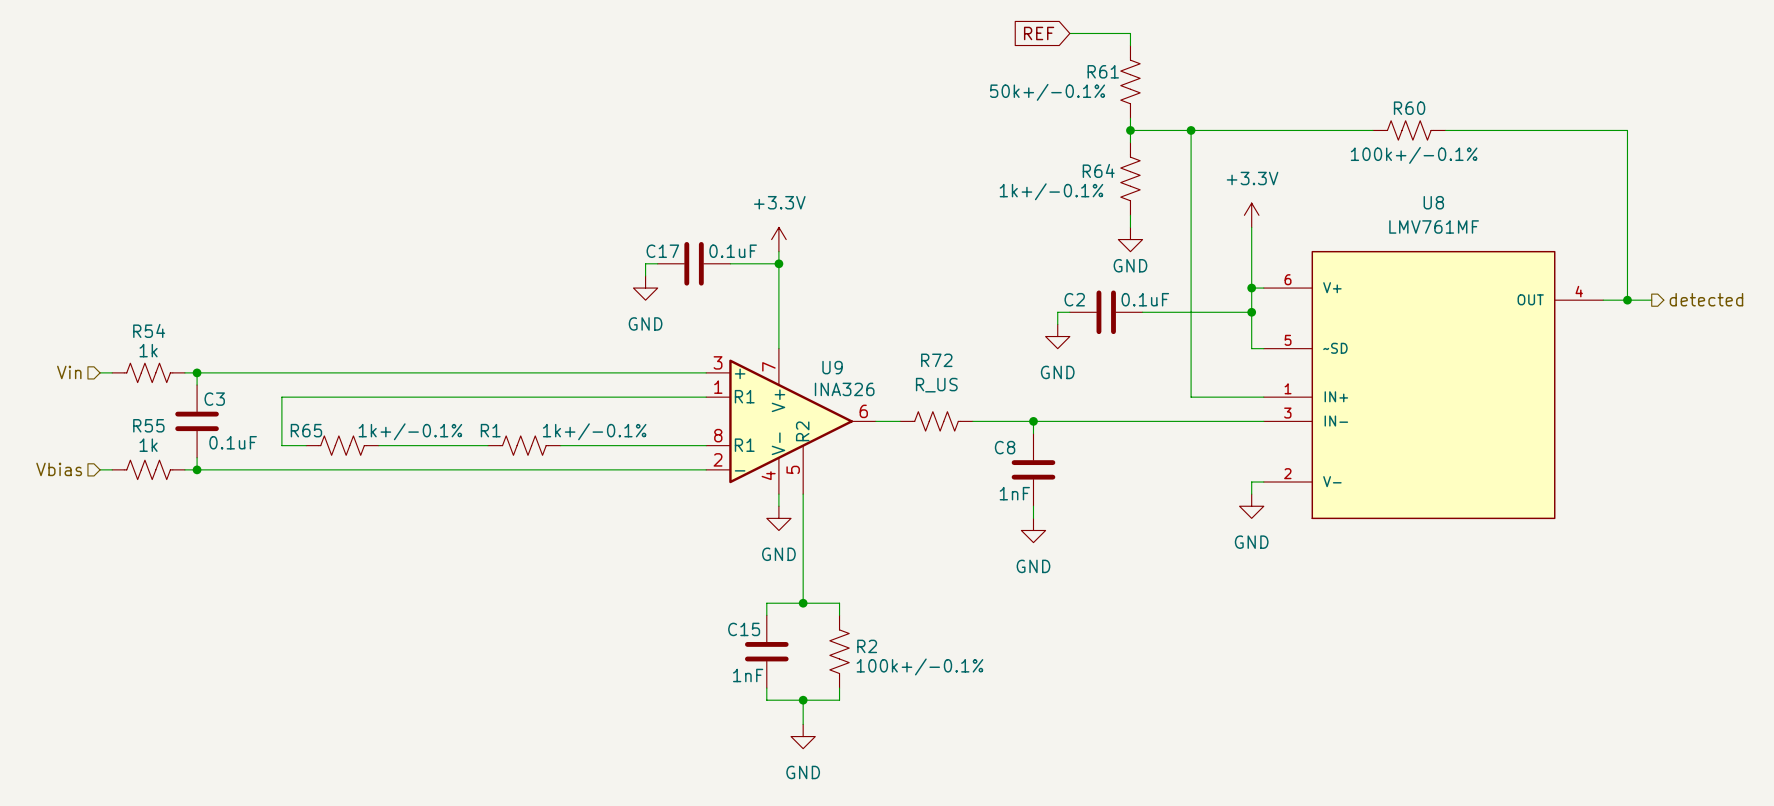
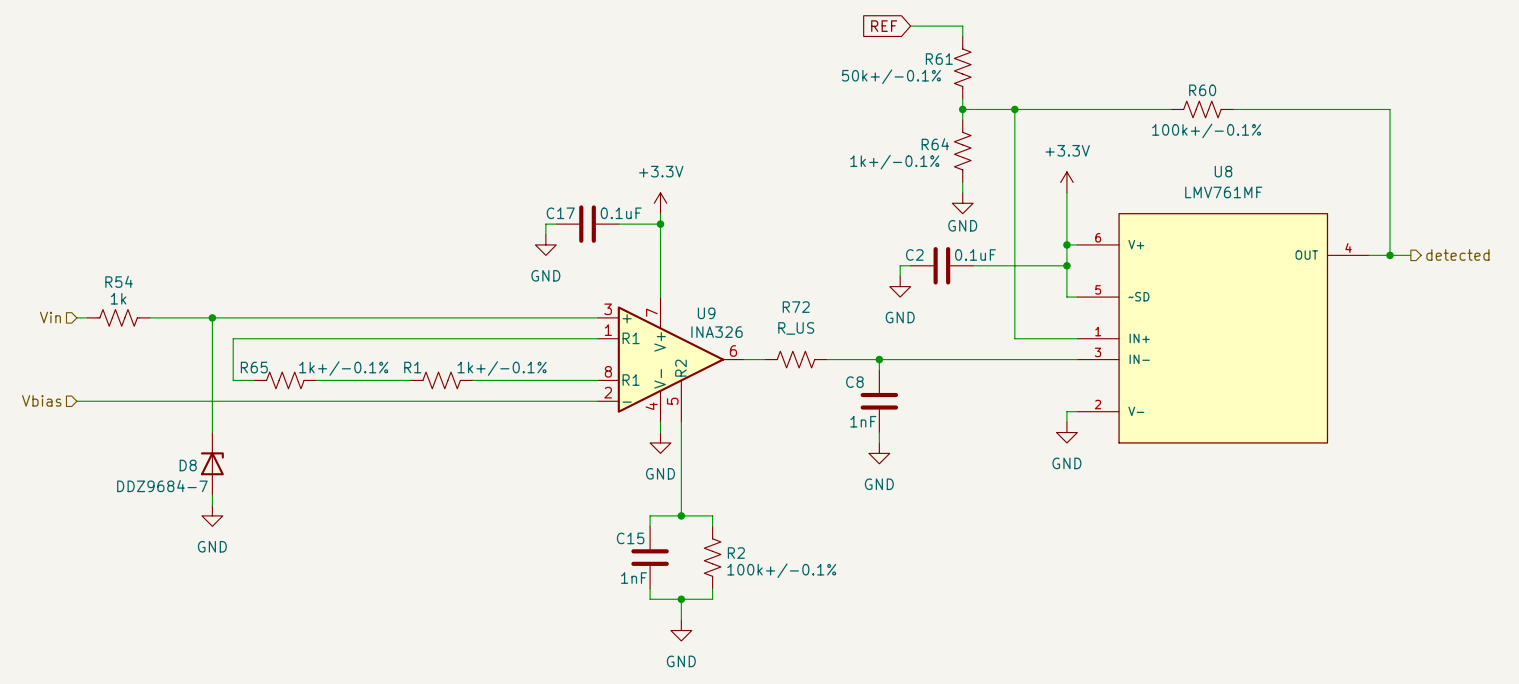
wire: (197, 372) (197, 385) -> none
junction: (197, 372) -> none
wire: none -> (212, 317) (212, 432)
junction: none -> (212, 317)
C3: 0.1uF (197, 421) -> none
wire: (197, 457) (197, 469) -> (212, 495) (212, 505)
R55: 1k (148, 469) -> none
junction: (197, 469) -> none
D8: none -> DDZ9684-7 (212, 463)
power symbol: none -> GND (212, 515)

